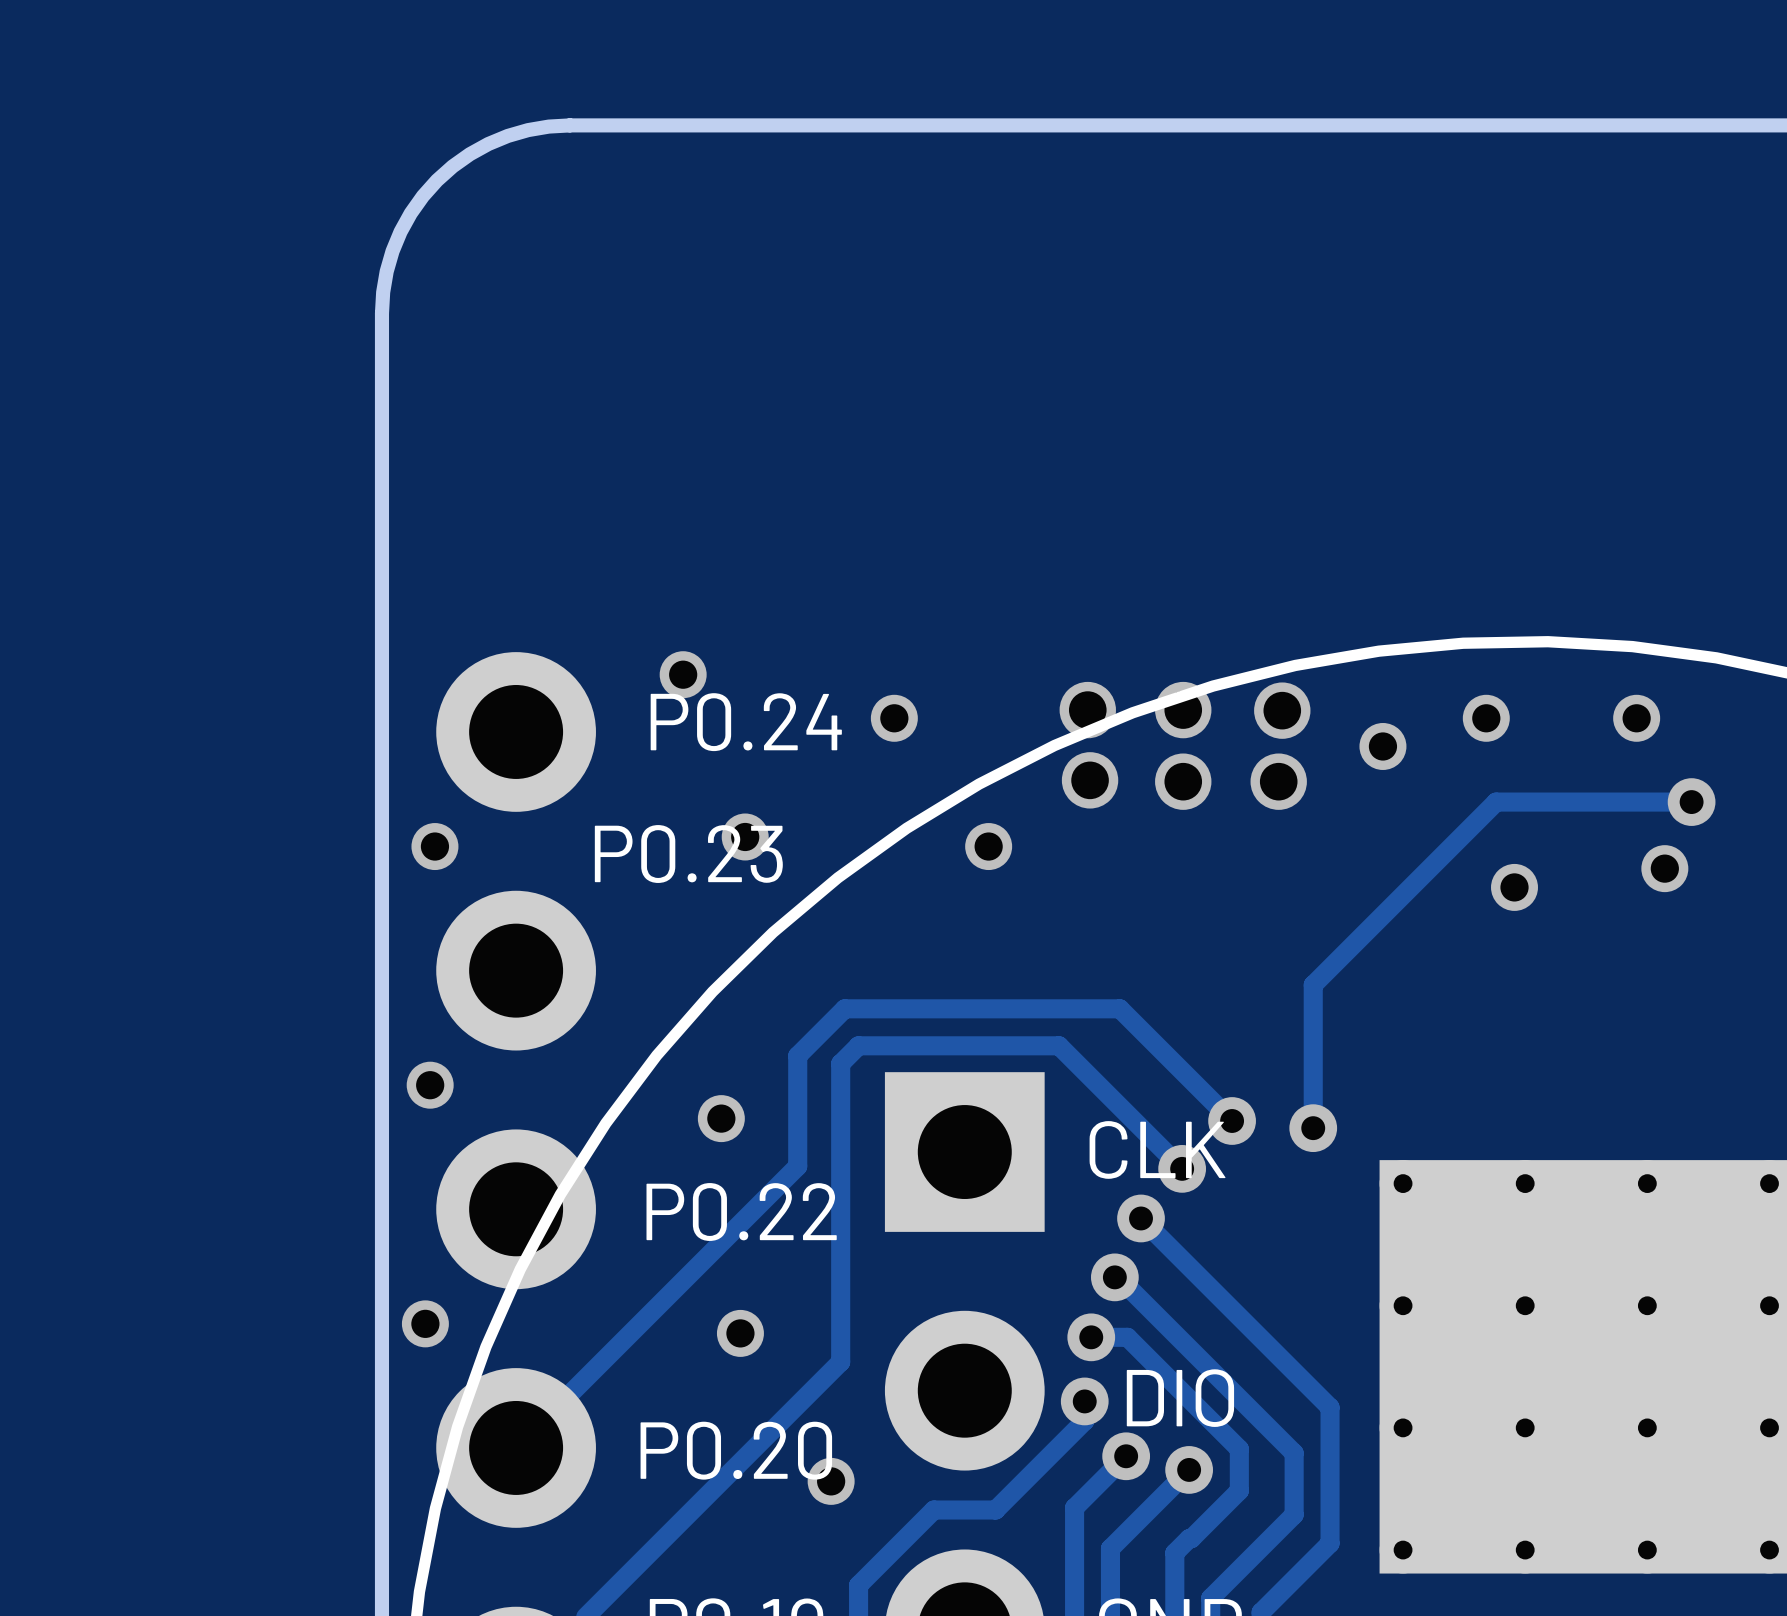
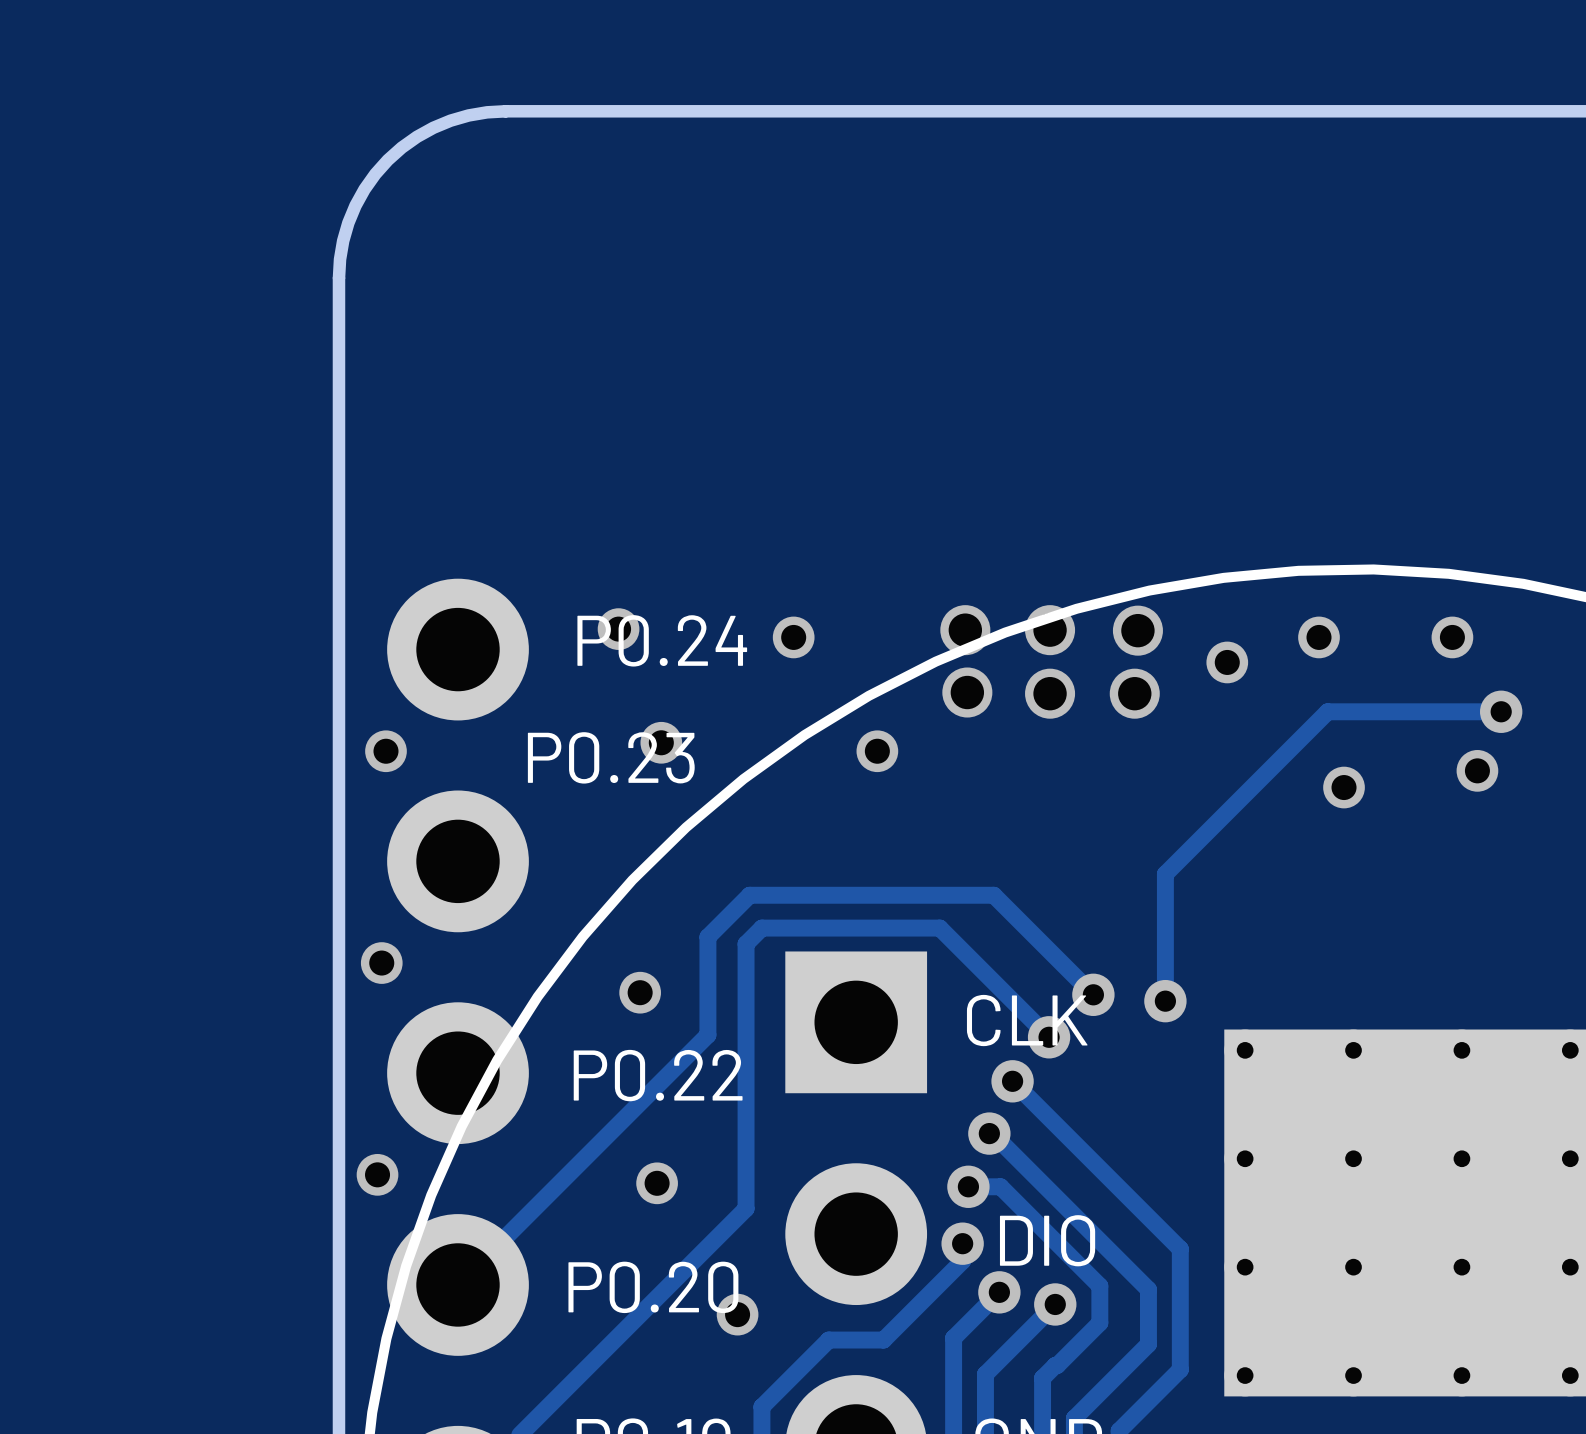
via position: (683, 674) -> (618, 629)

